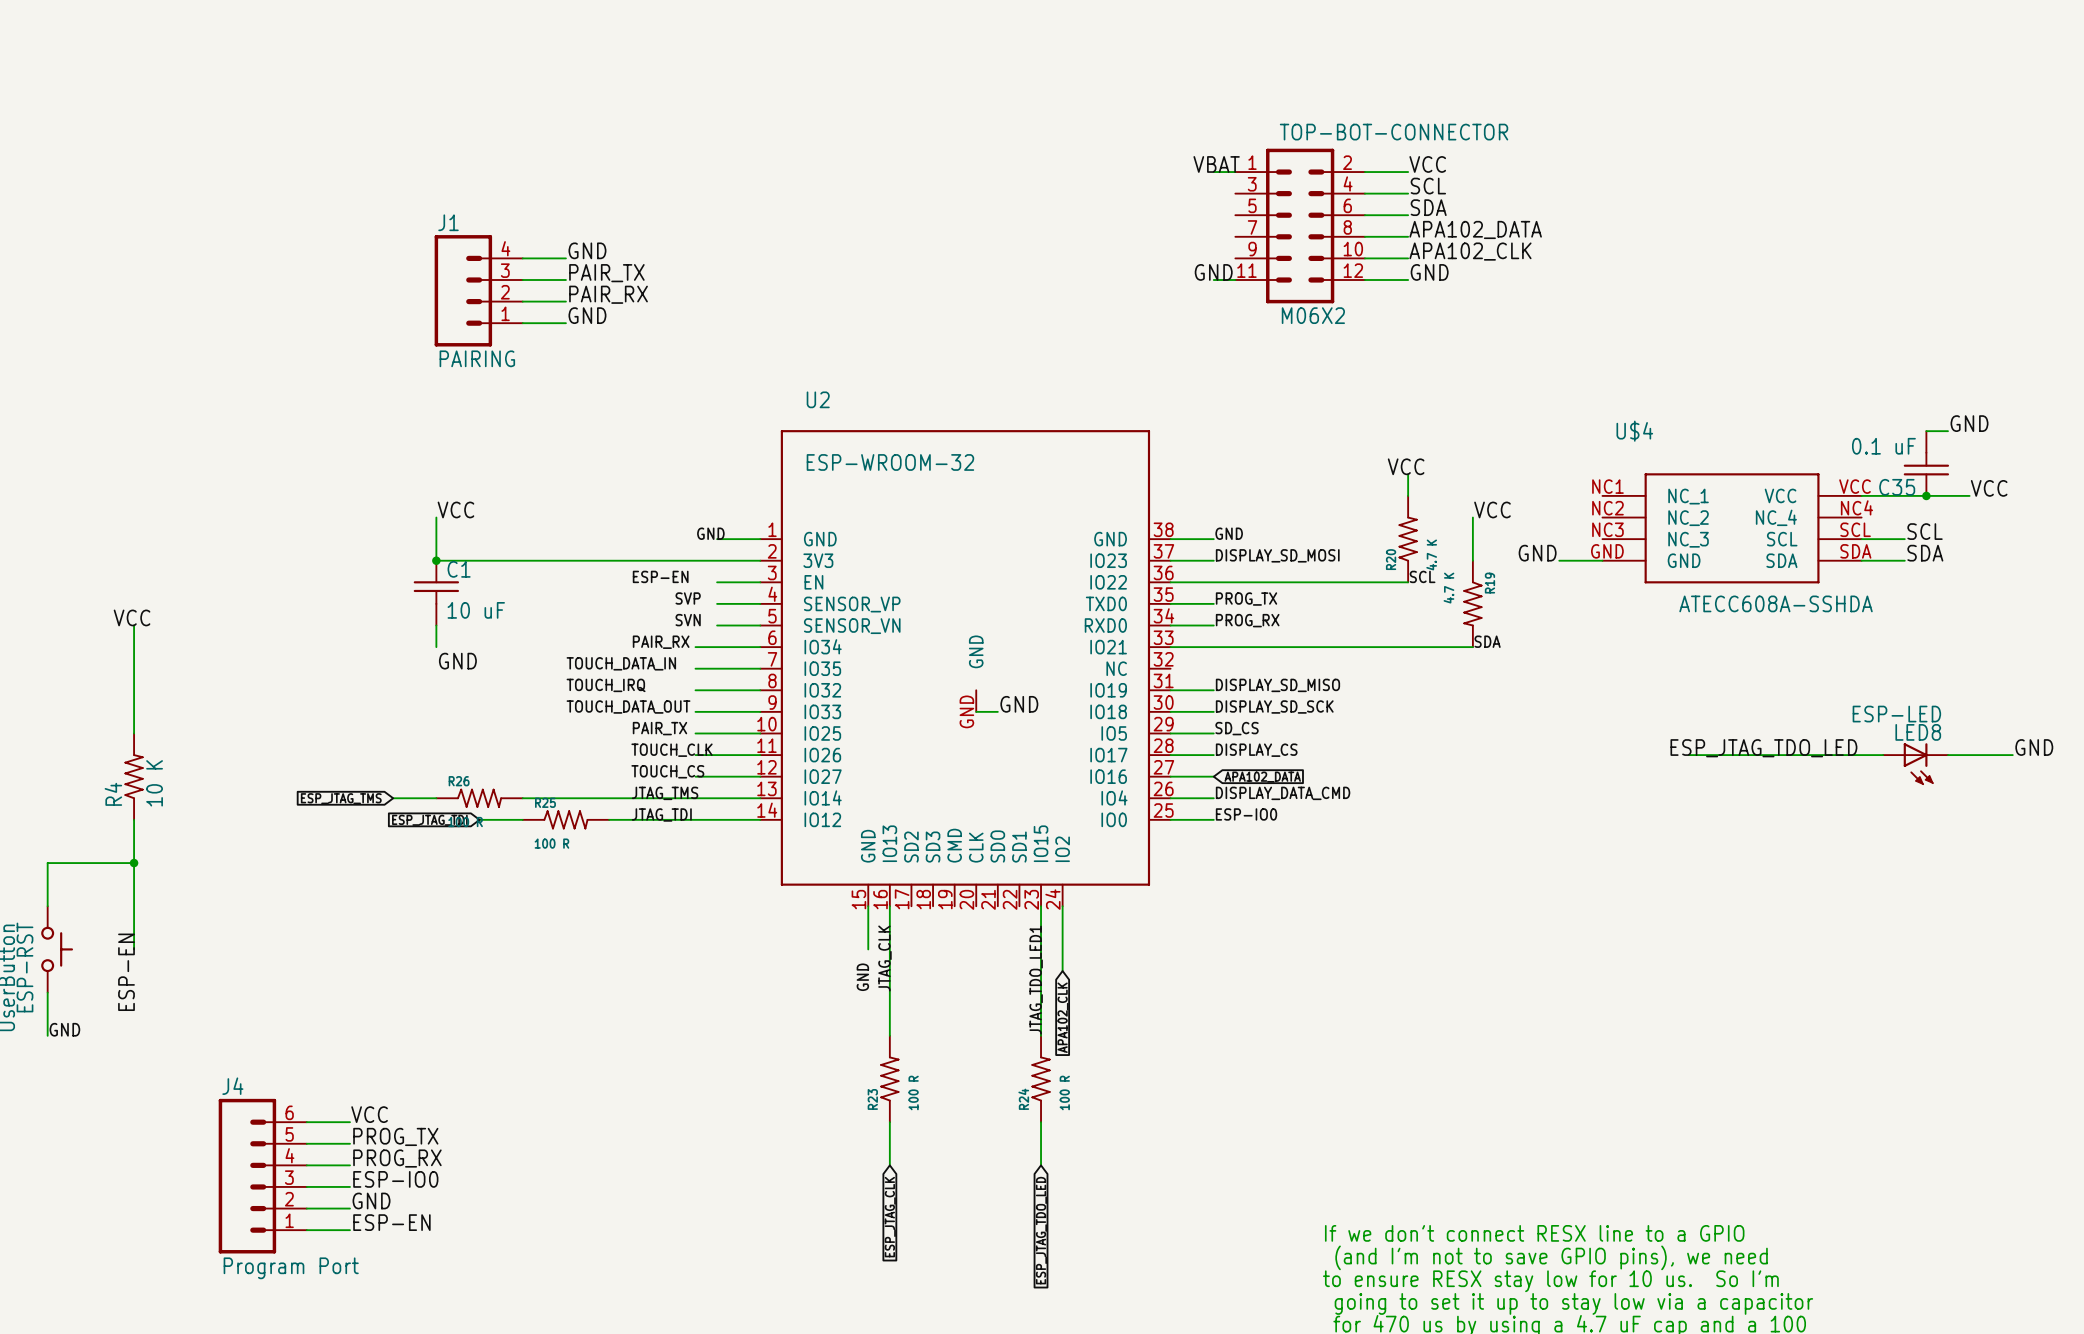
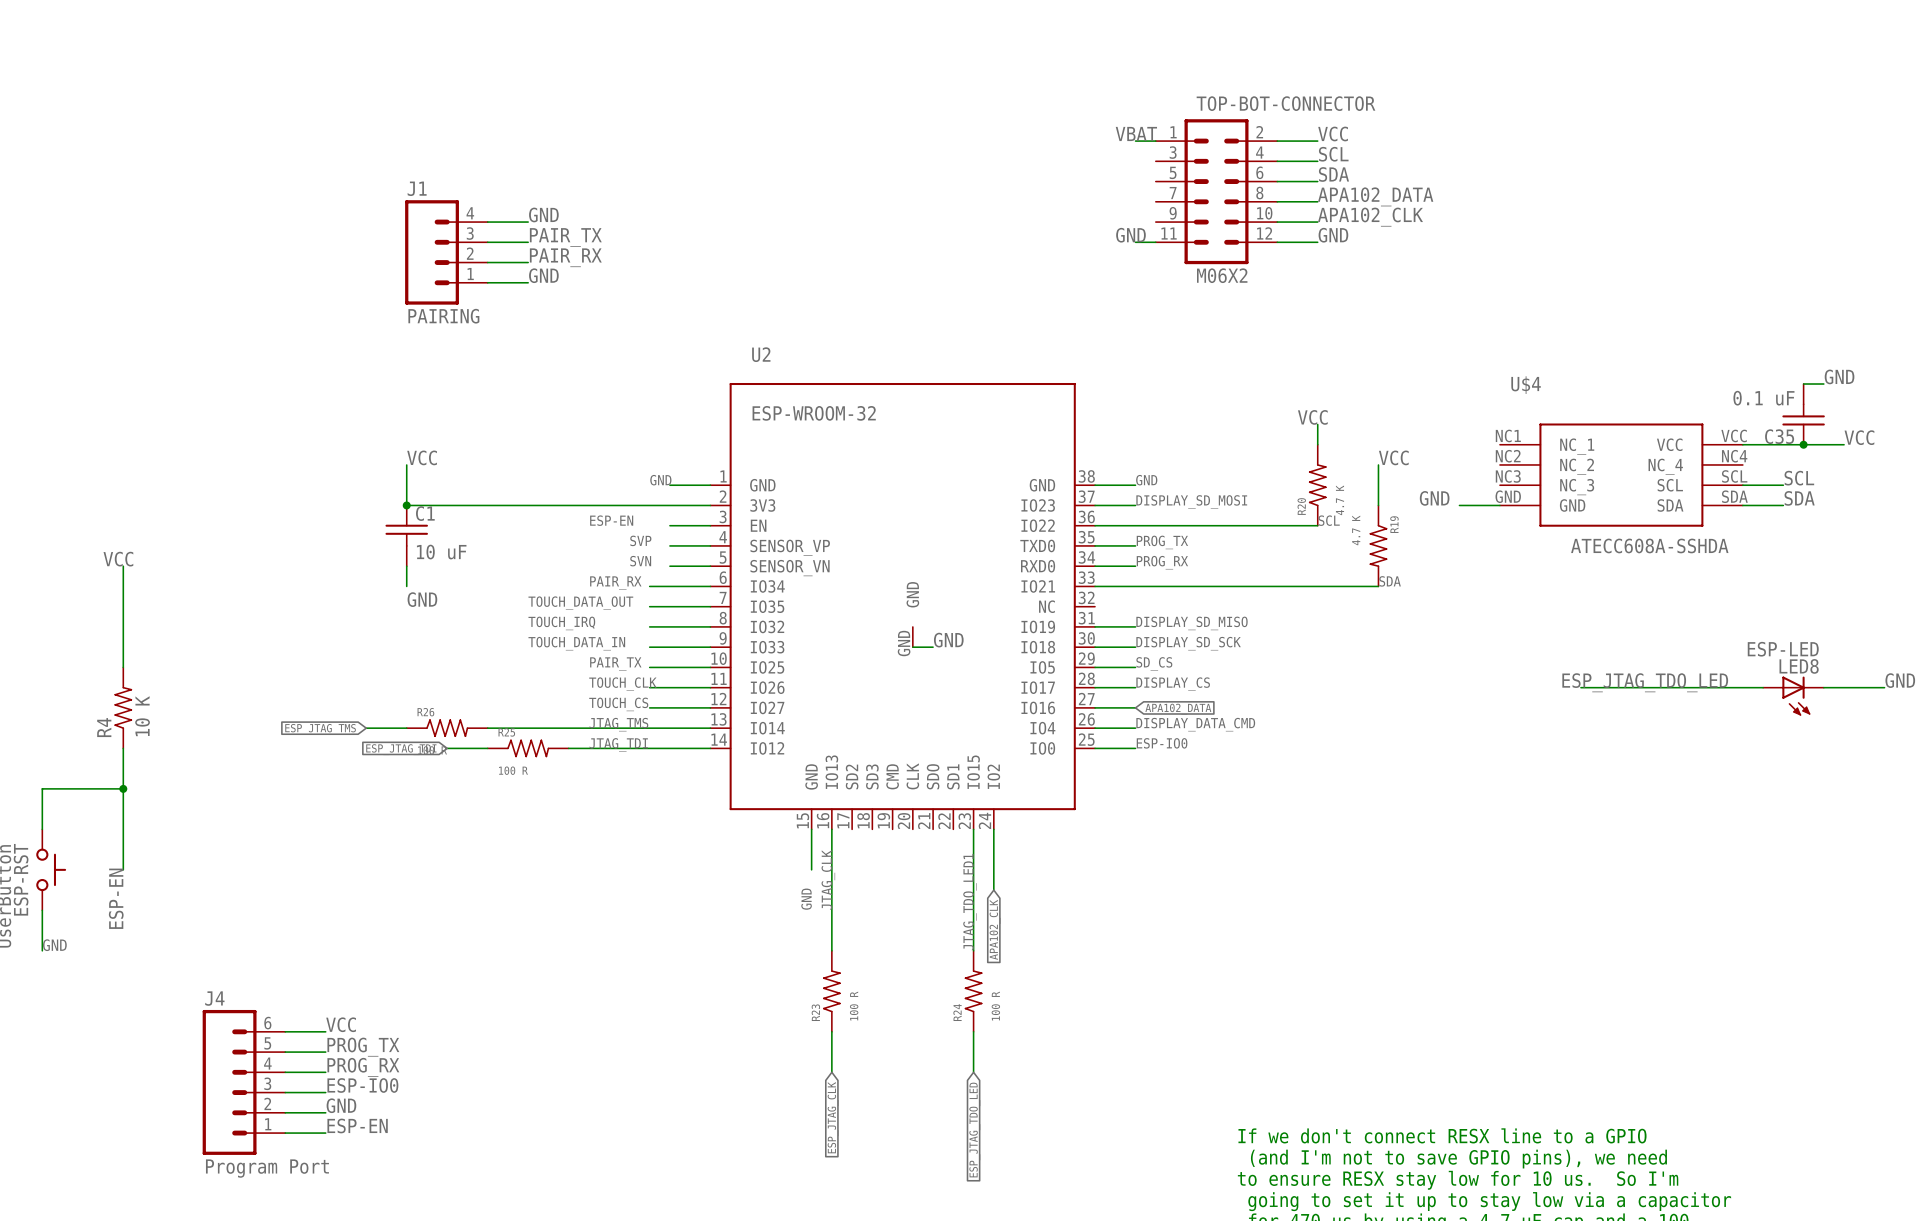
label: TOUCH_DATA_IN (621, 663) -> TOUCH_DATA_OUT (580, 603)
label: TOUCH_DATA_OUT (628, 707) -> TOUCH_DATA_IN (576, 643)

